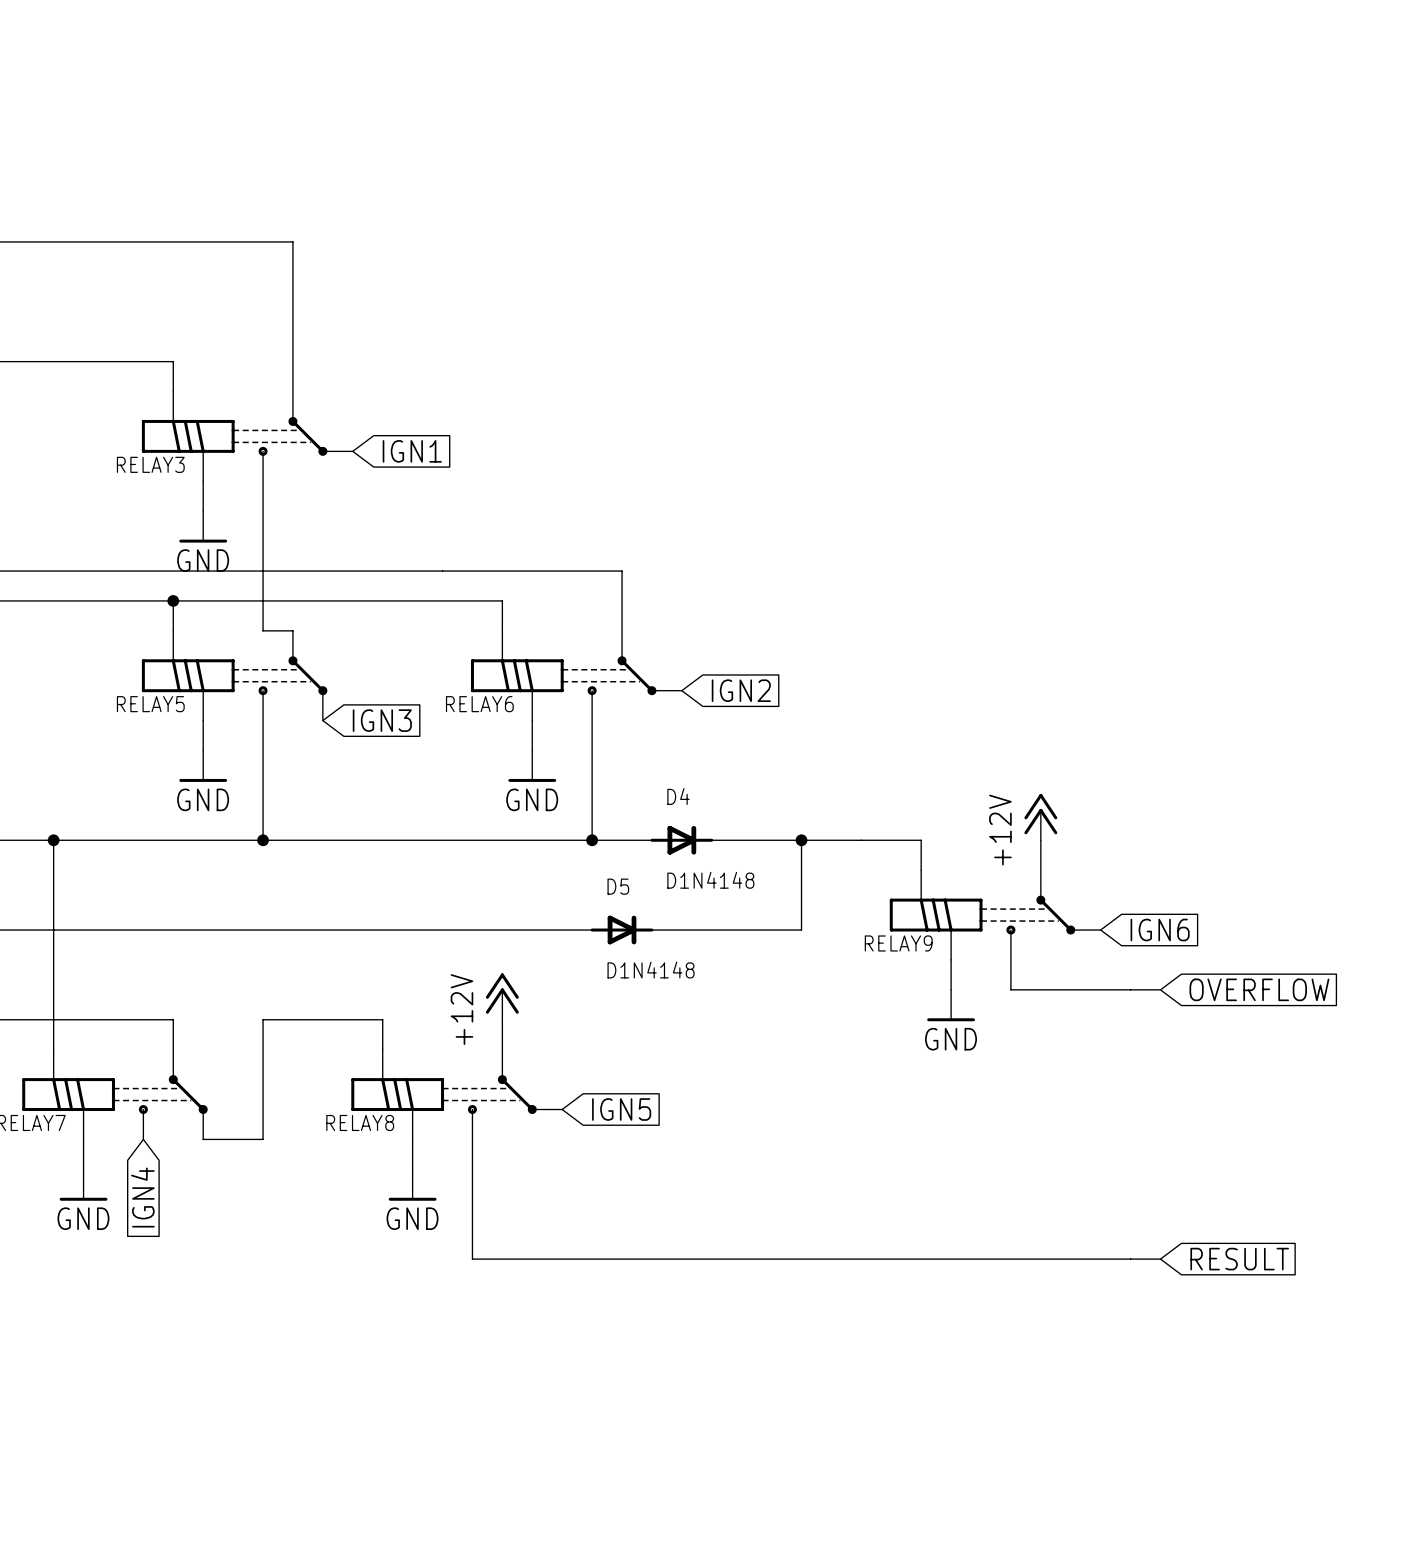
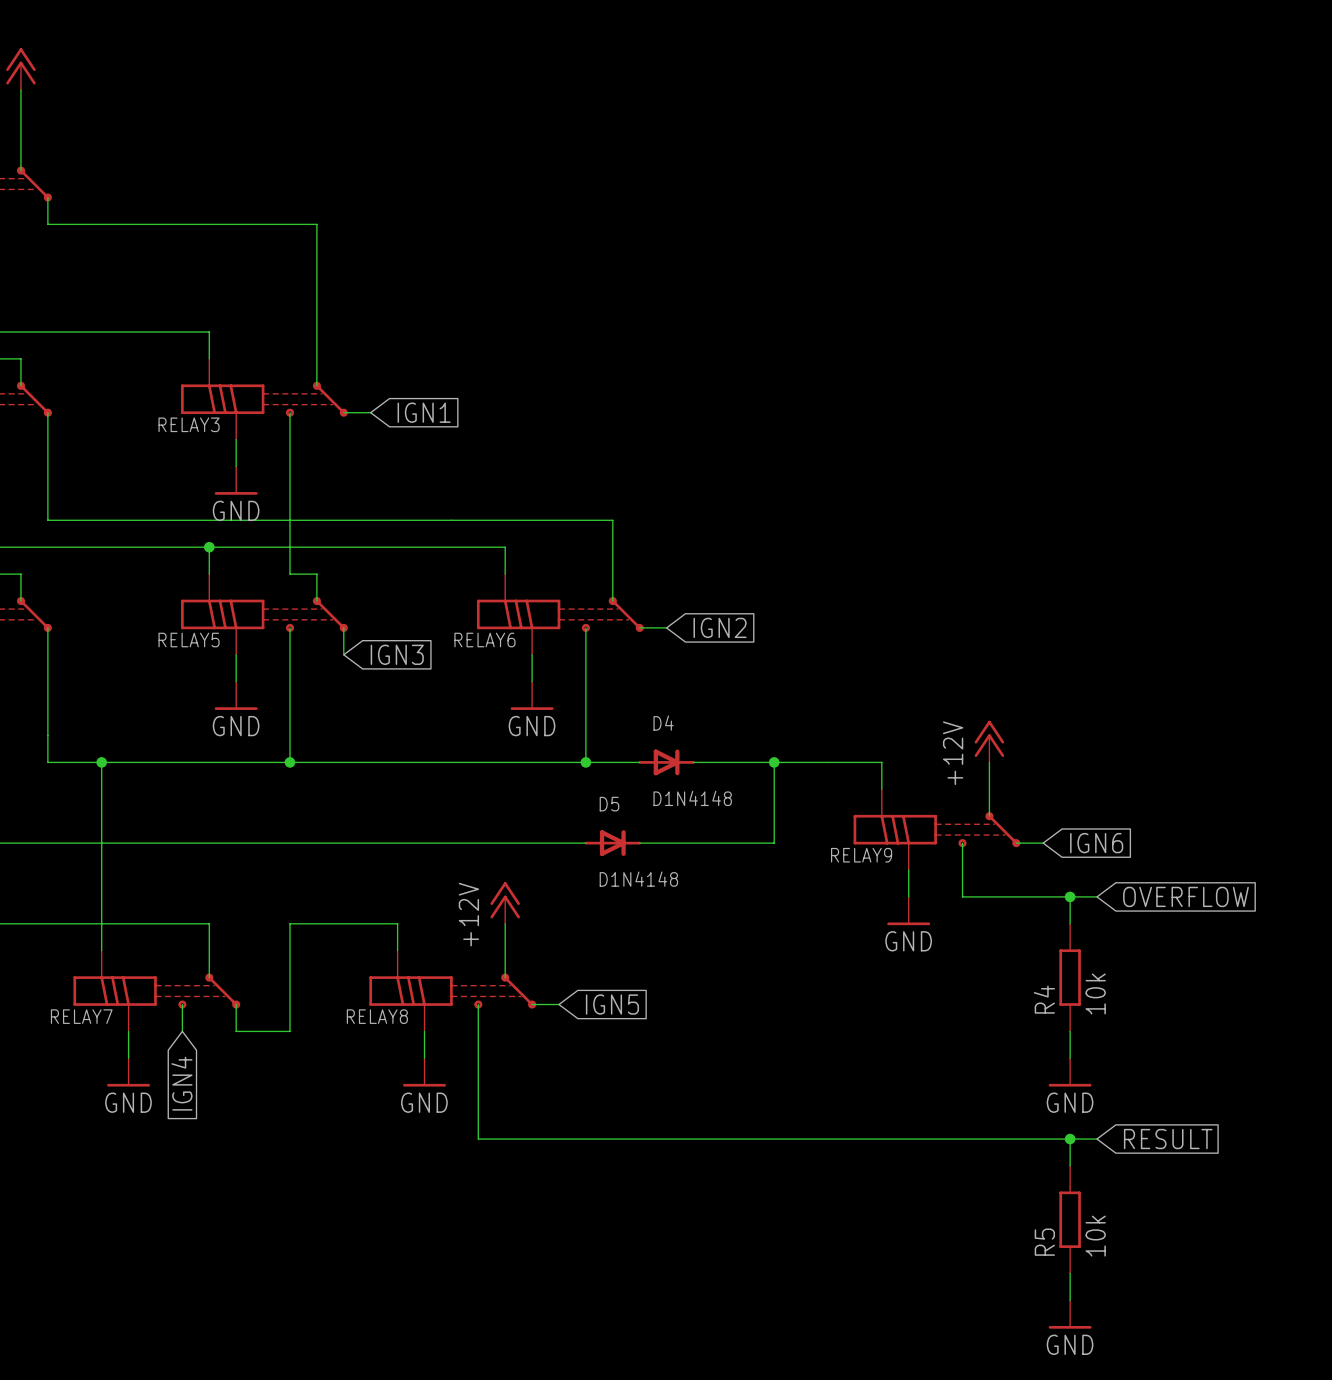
wire: none -> (1070, 896) (1070, 923)
junction: none -> (1070, 896)
R4: none -> 10k (1070, 977)
wire: none -> (1070, 1031) (1070, 1058)
power symbol: none -> GND (1070, 1072)
wire: none -> (1070, 1139) (1070, 1165)
junction: none -> (1070, 1139)
R5: none -> 10k (1070, 1219)
wire: none -> (1070, 1273) (1070, 1300)
power symbol: none -> GND (1070, 1314)

